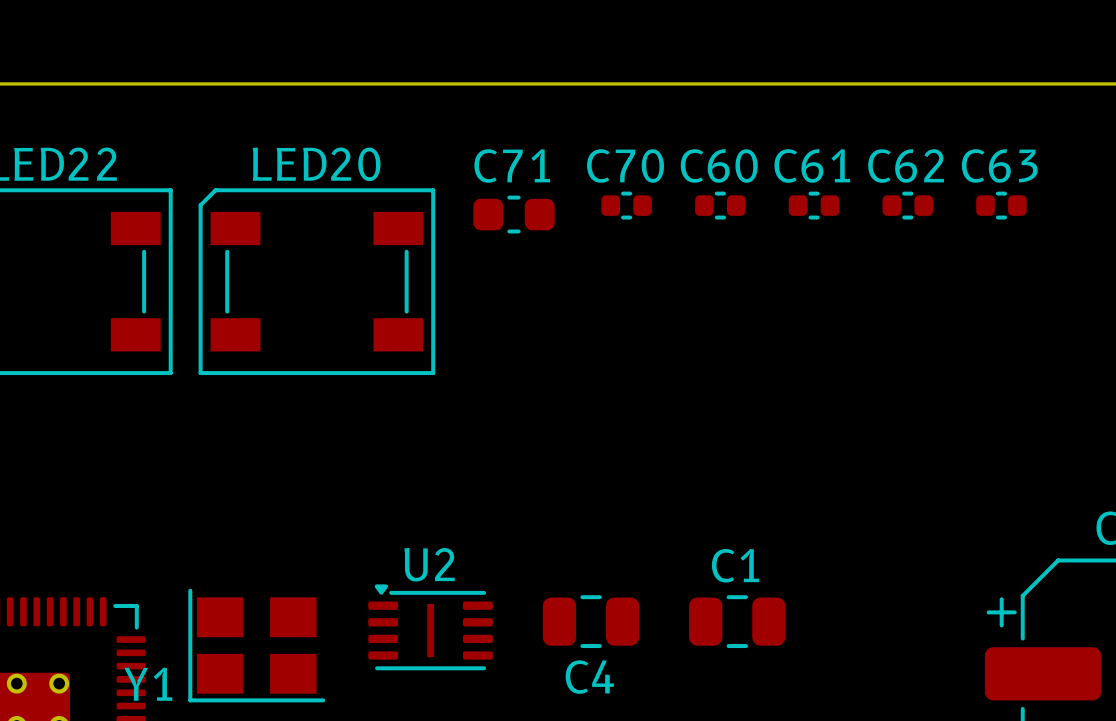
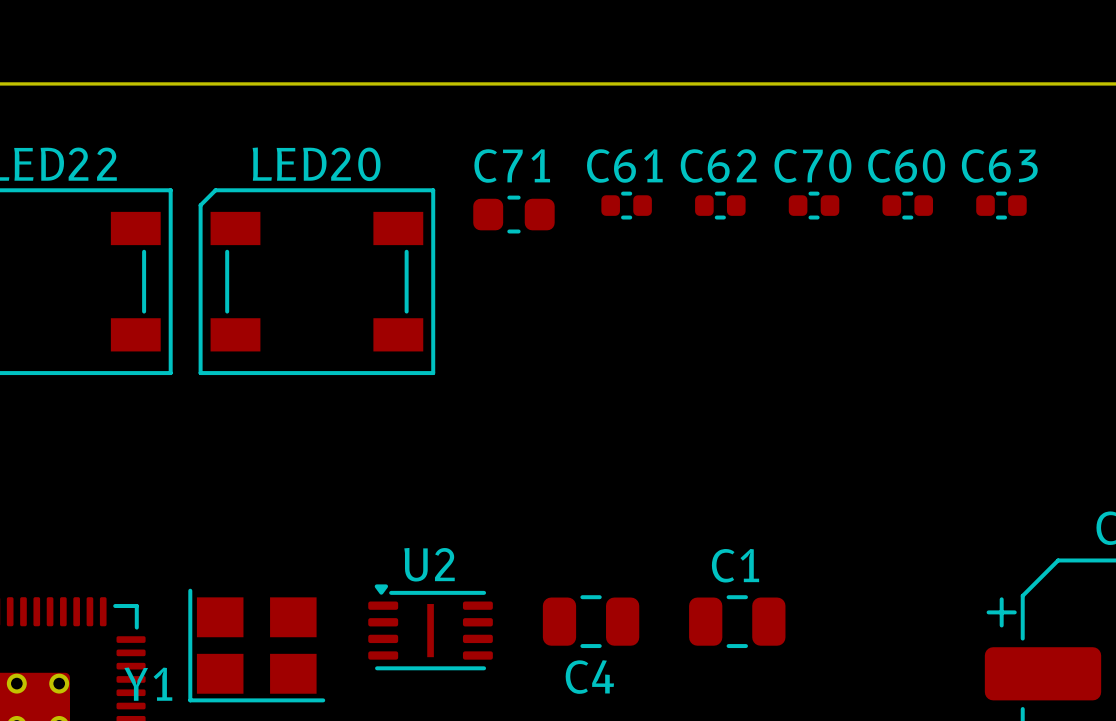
C70 name: C70 (625, 165) -> C61 (624, 165)
C60 name: C60 (719, 165) -> C62 (718, 165)
C61 name: C61 (812, 165) -> C70 (812, 165)
C62 name: C62 (906, 165) -> C60 (906, 165)

